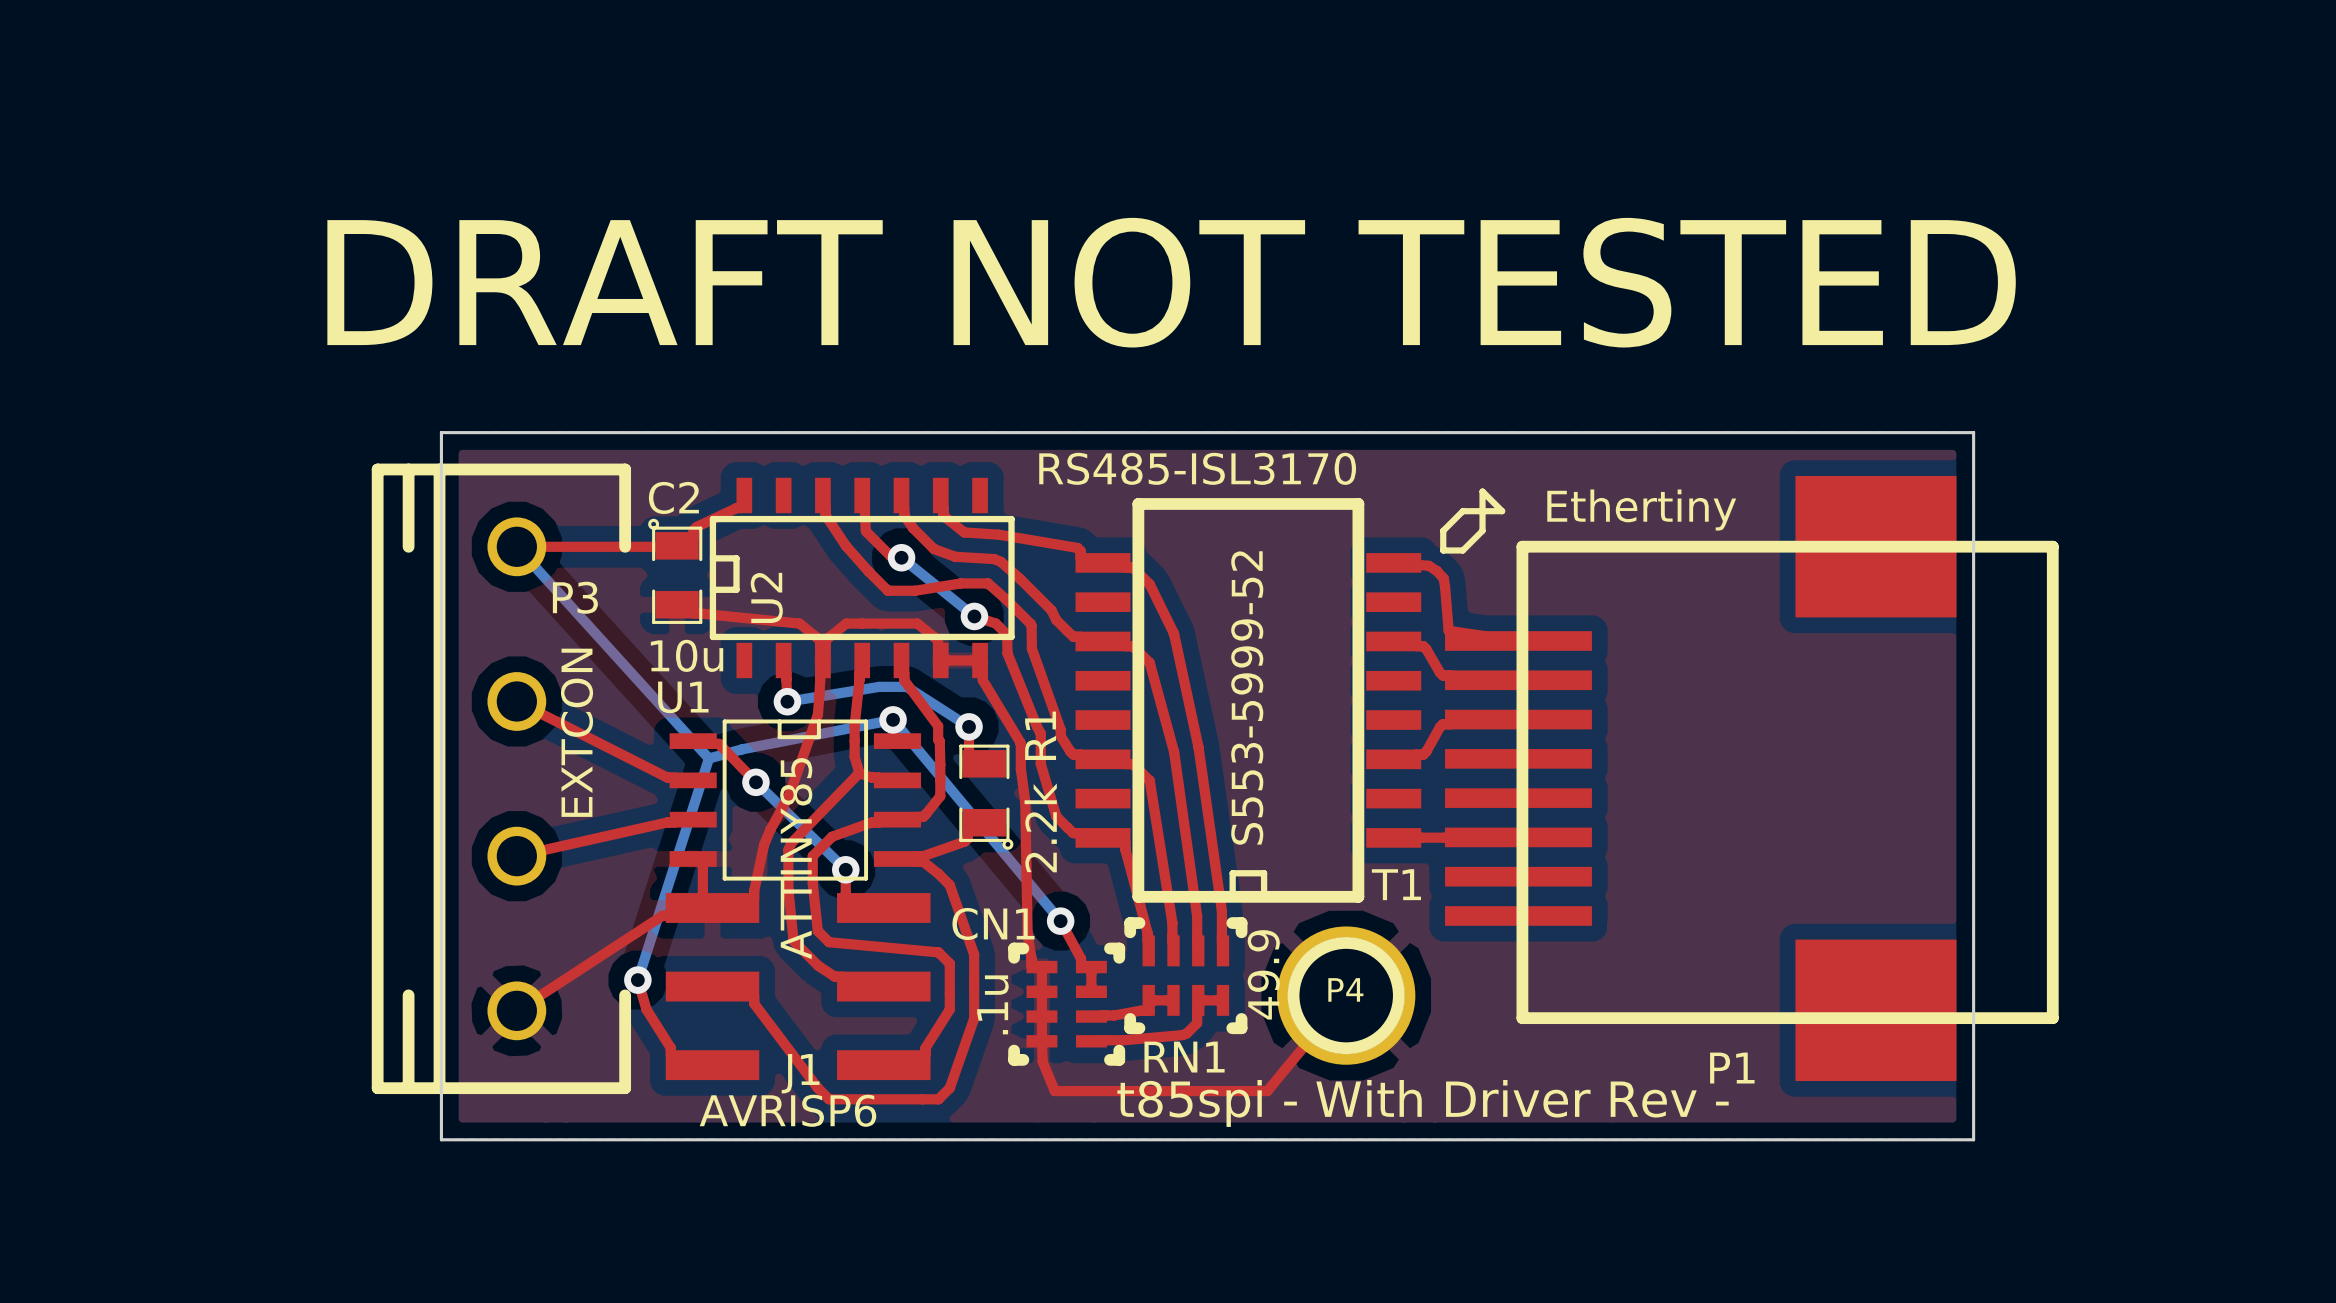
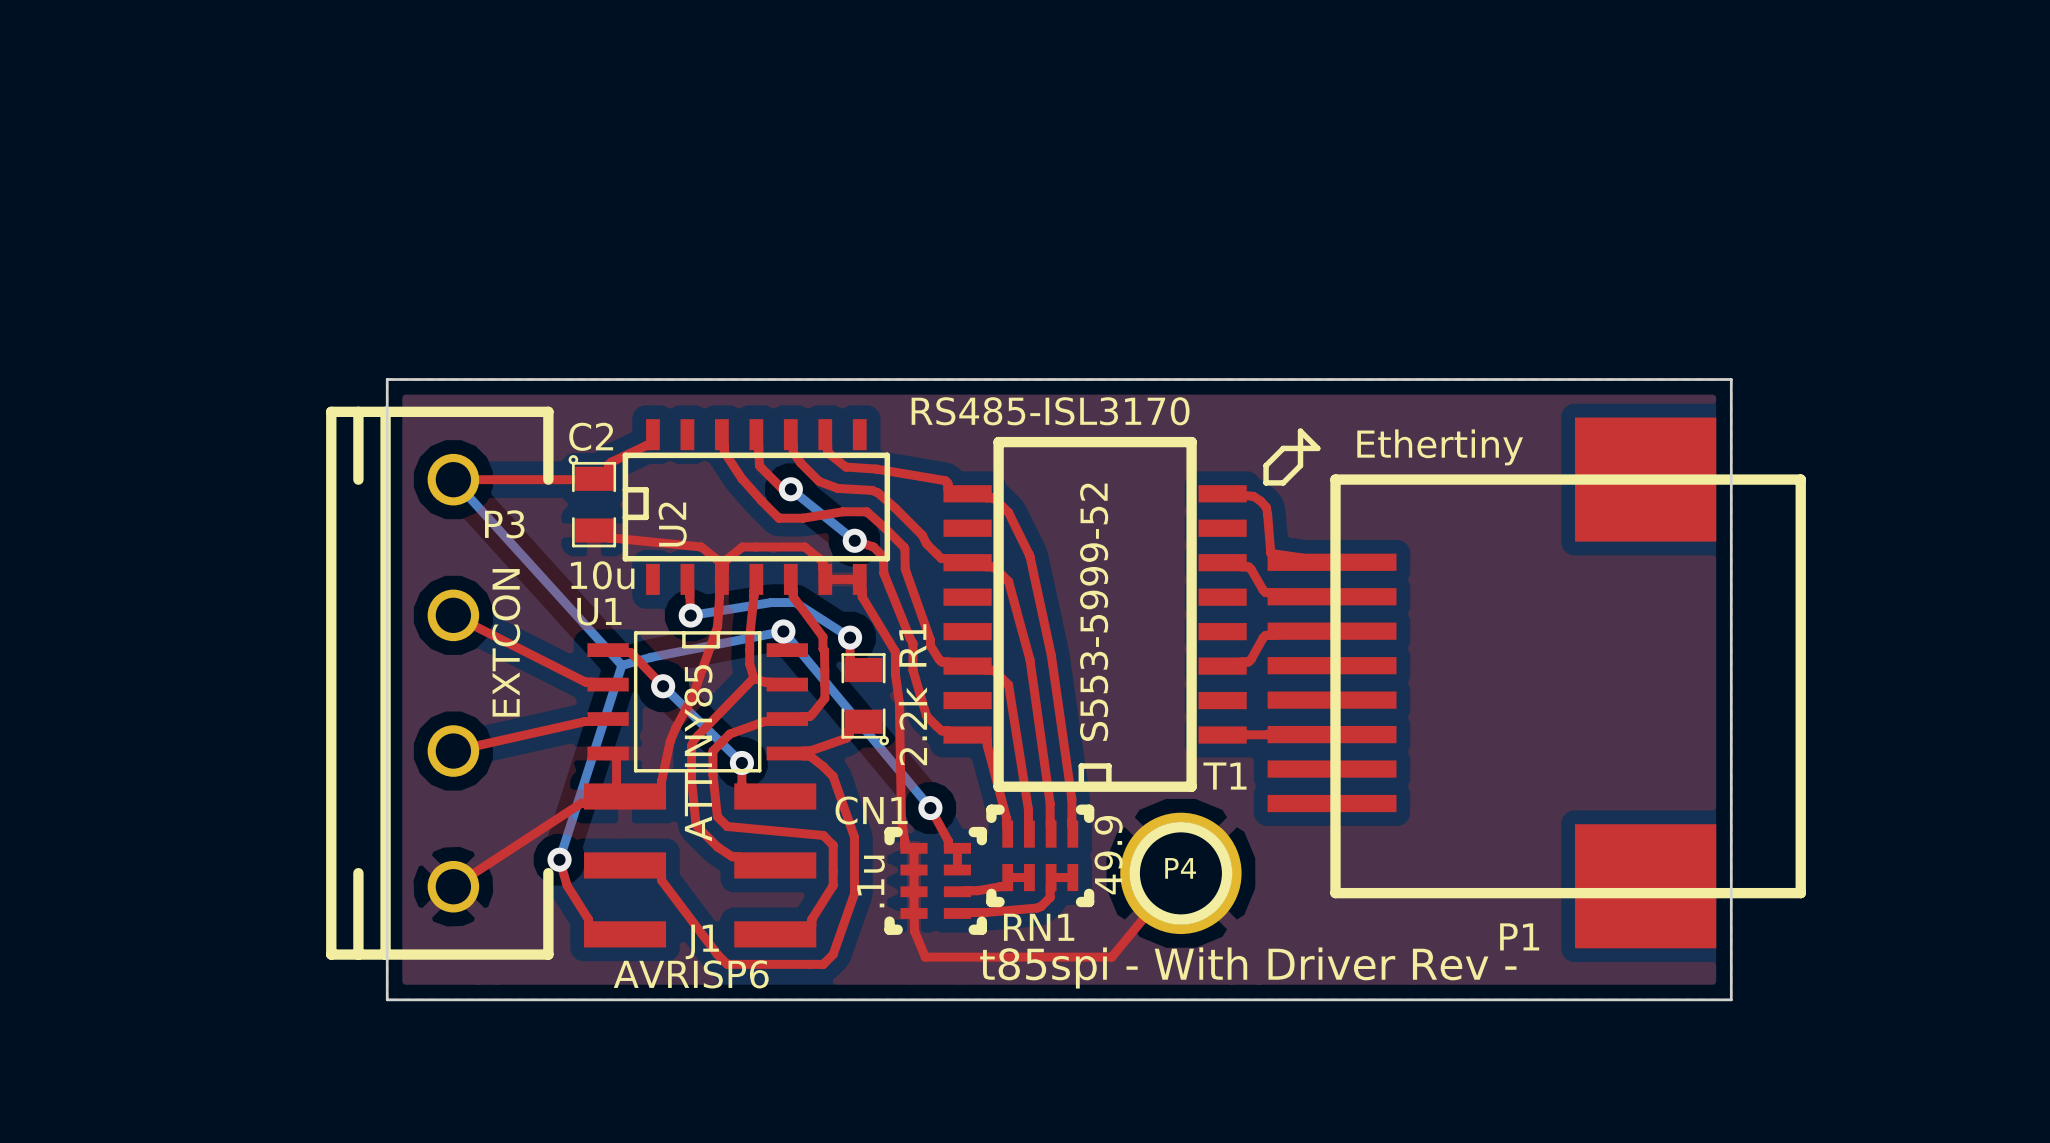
text: DRAFT NOT TESTED (1171, 282) -> none

